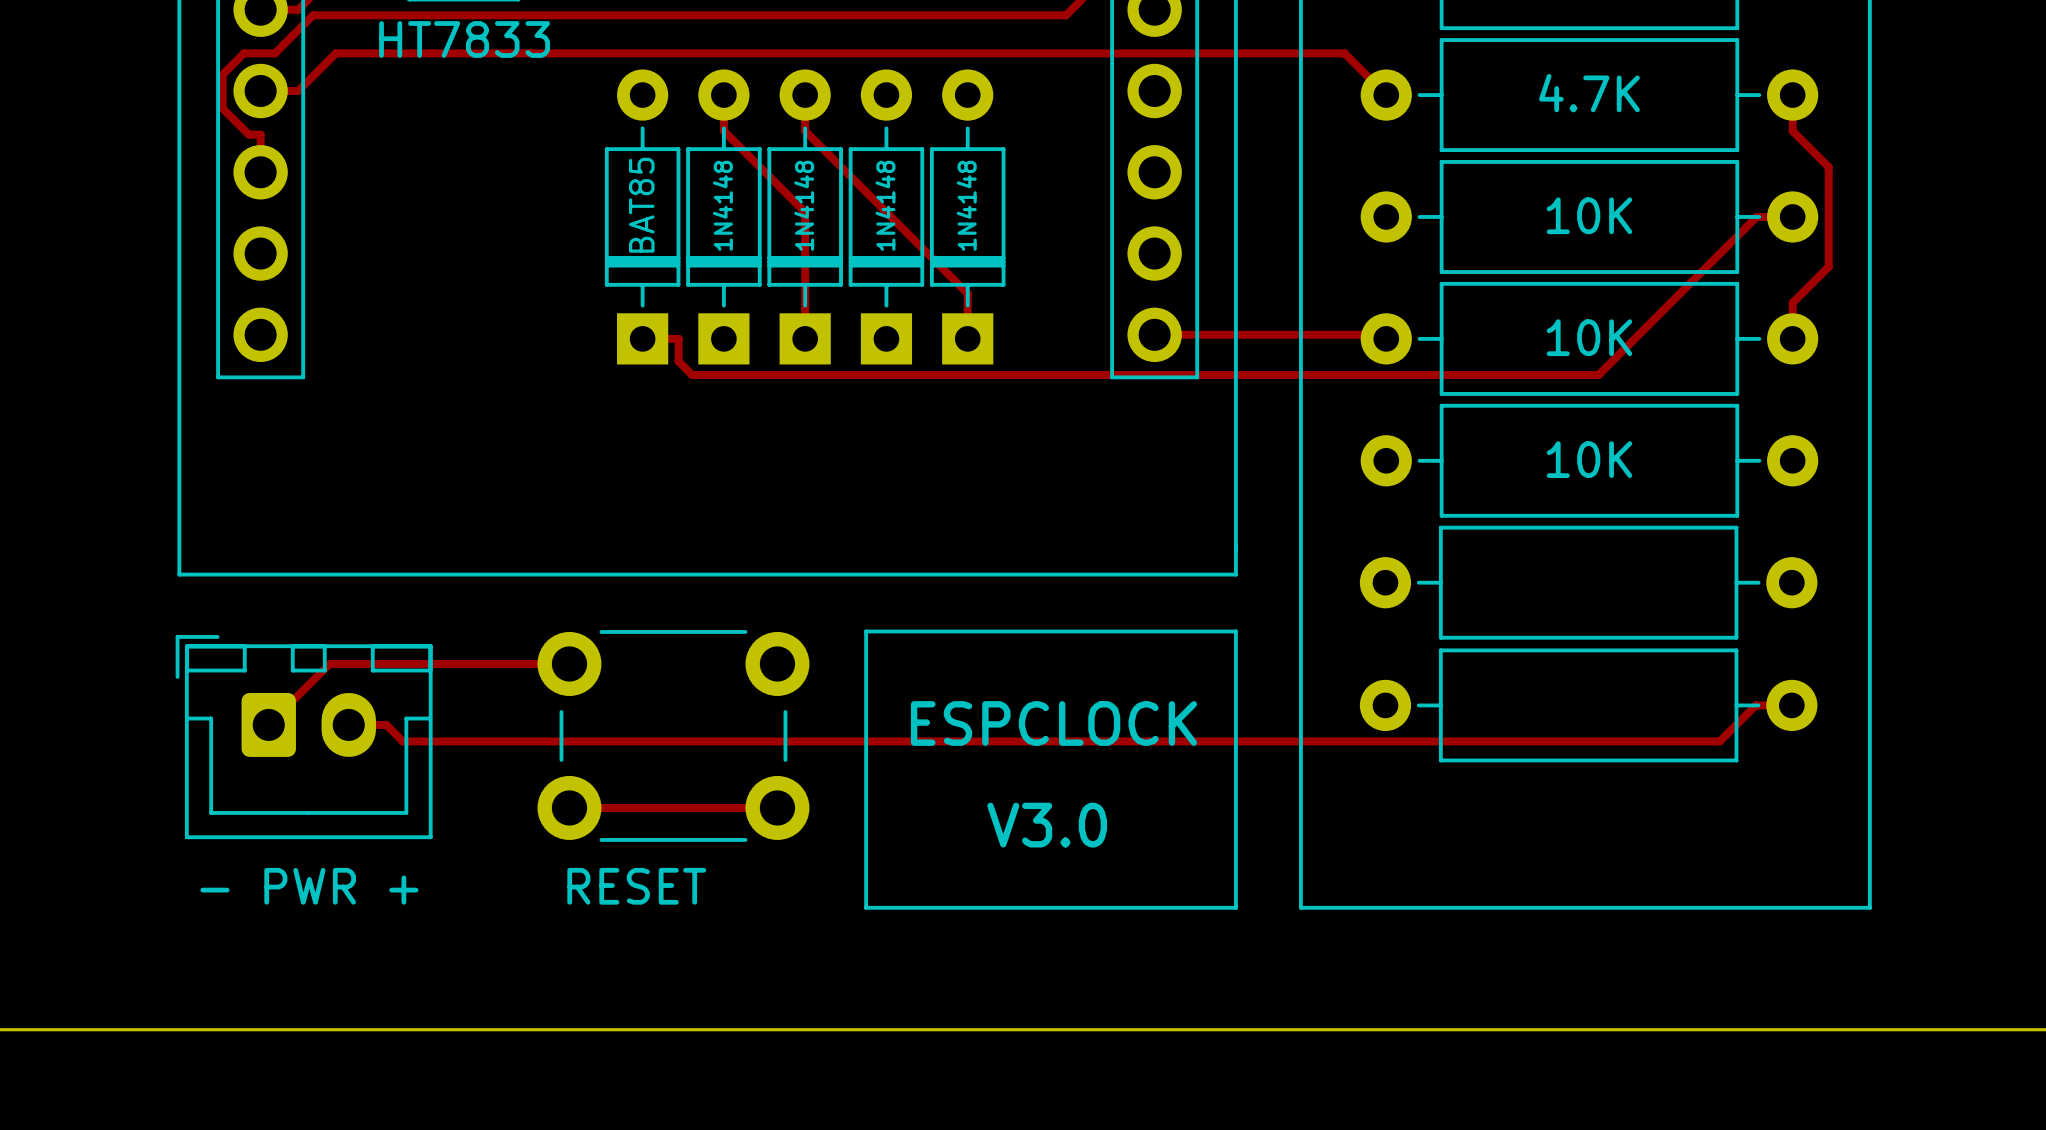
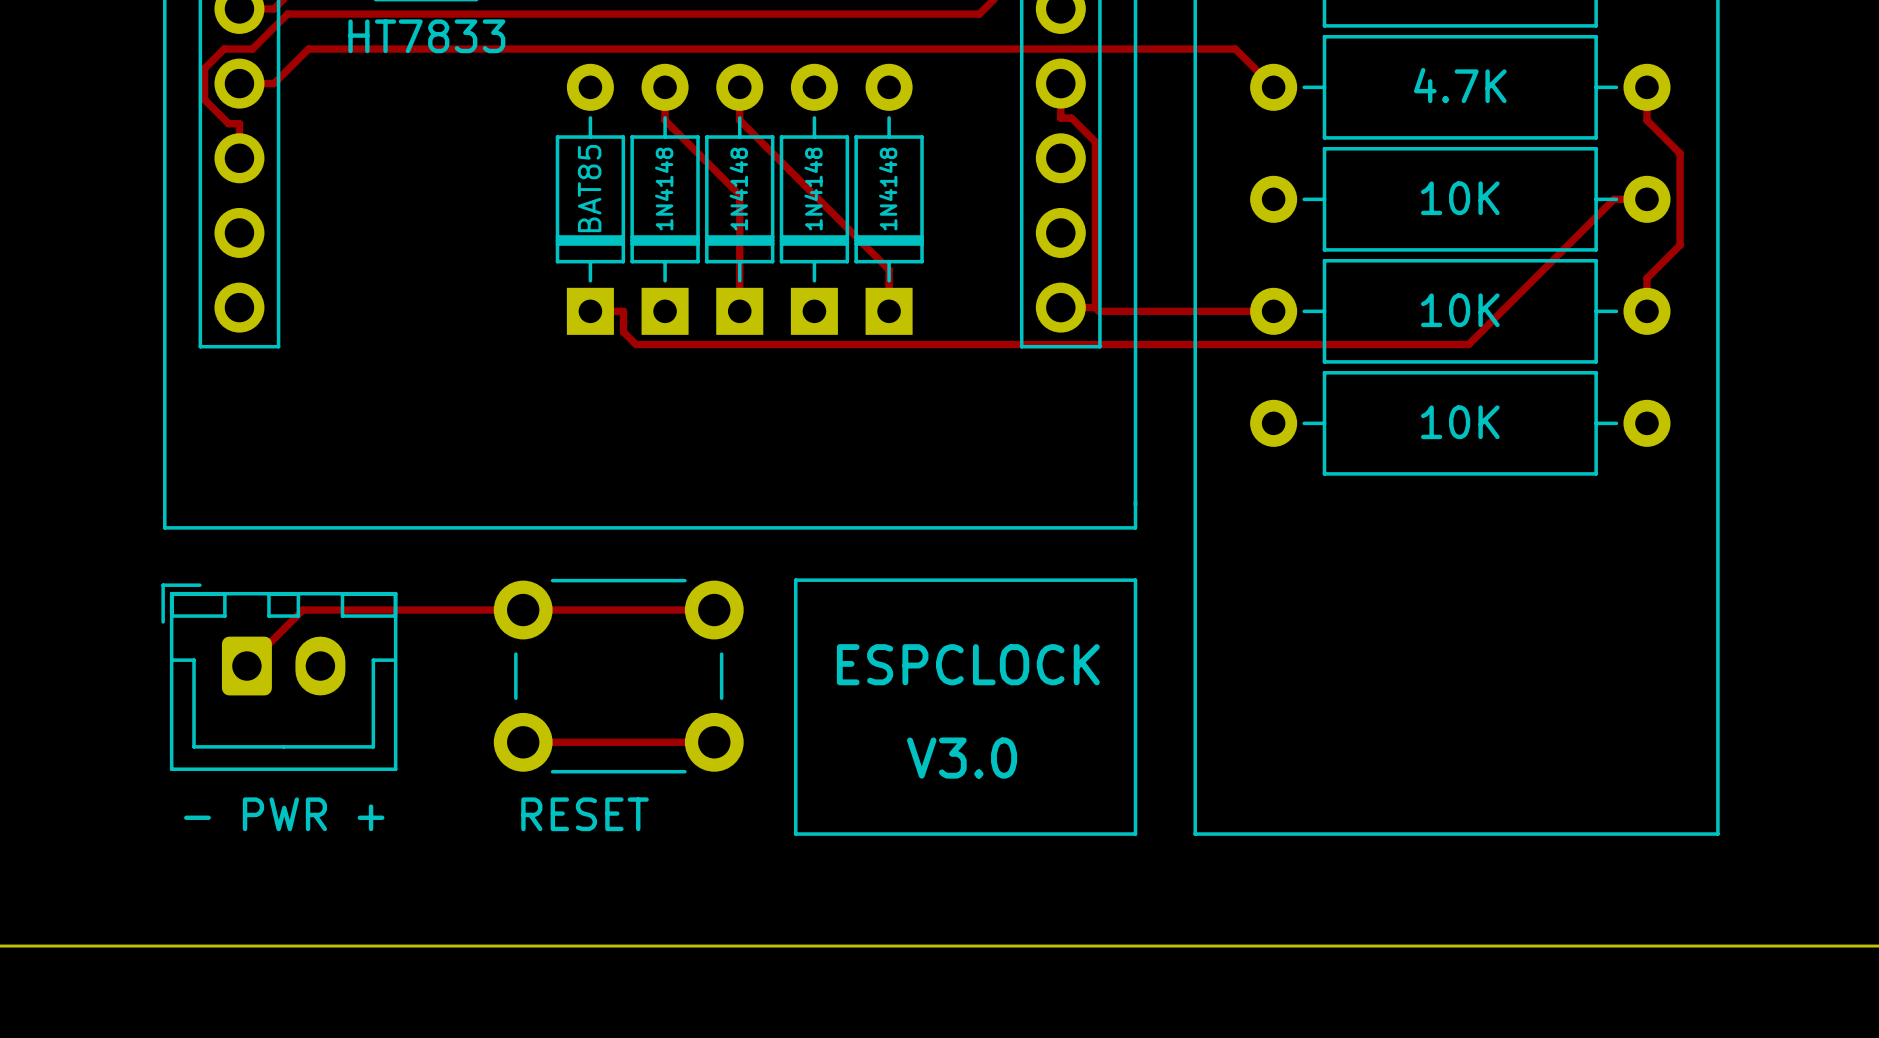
track: (1192, 334) (1382, 334) (1386, 338) -> (1060, 83) (1060, 118) (1071, 118) (1095, 141) (1095, 307) (1099, 311) (1273, 311)
part: (1588, 582) -> none
track: none -> (523, 610) (714, 610)
part: (1588, 705) -> none
track: (1791, 705) (1755, 705) (1719, 741) (402, 741) (386, 724) (348, 724) -> none

